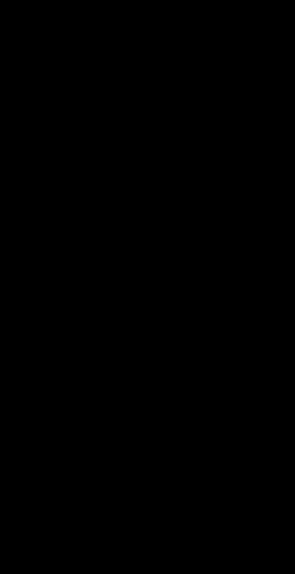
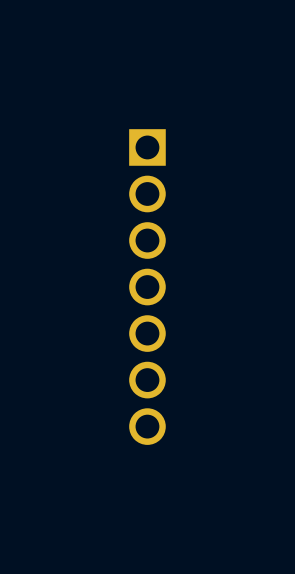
part: none -> (147, 287)

